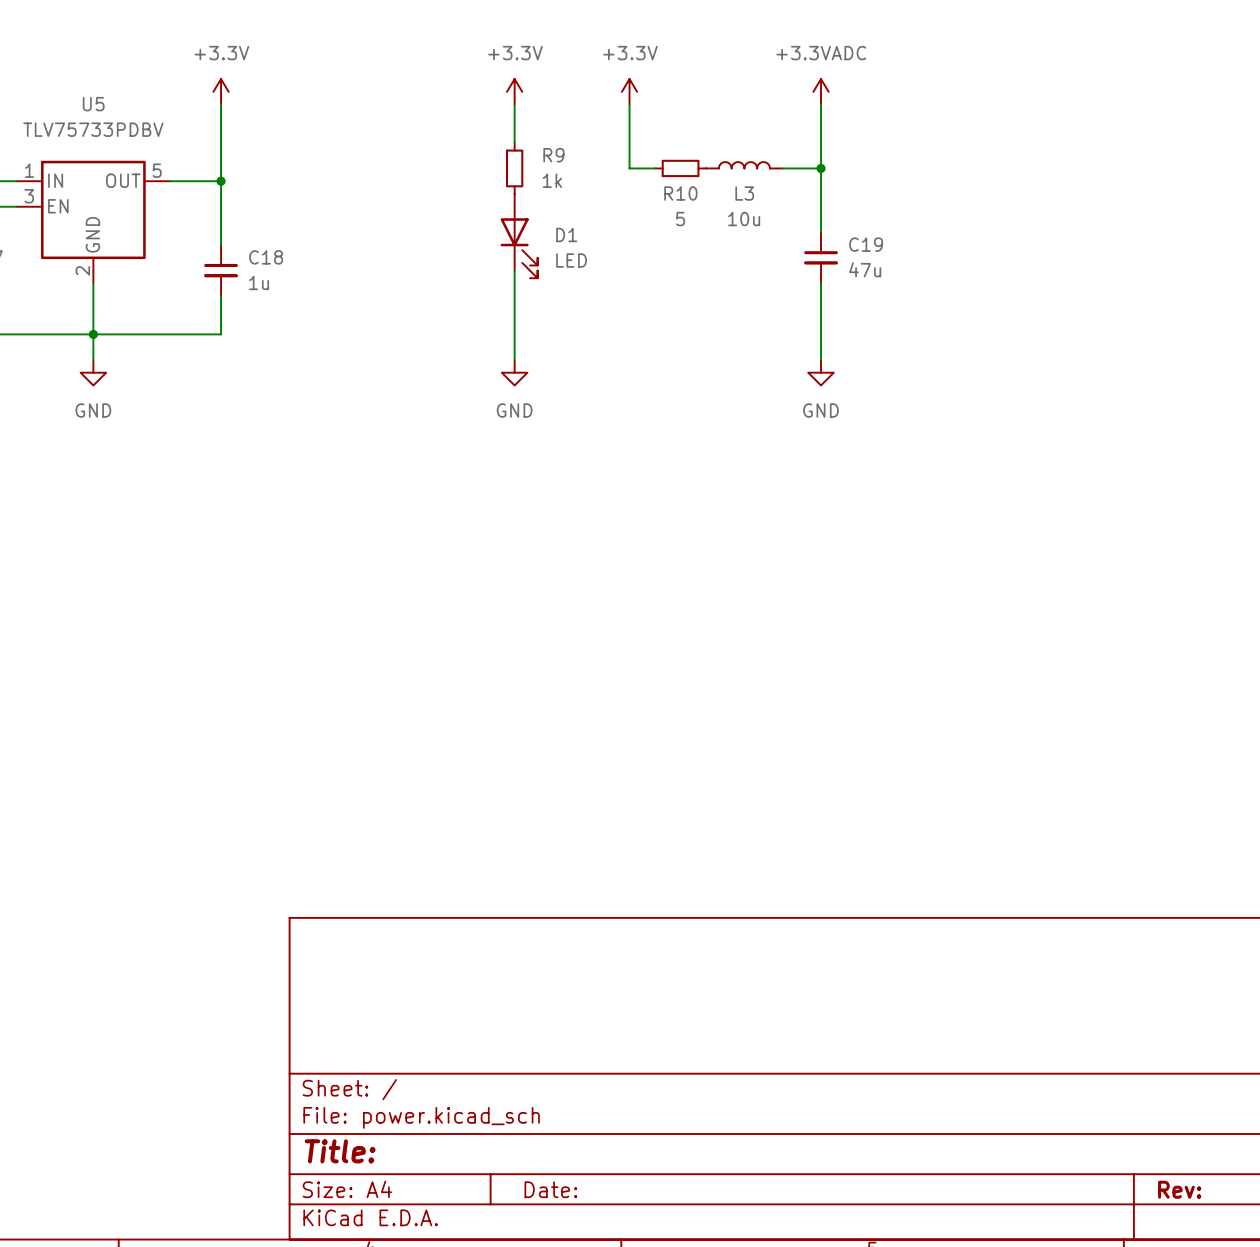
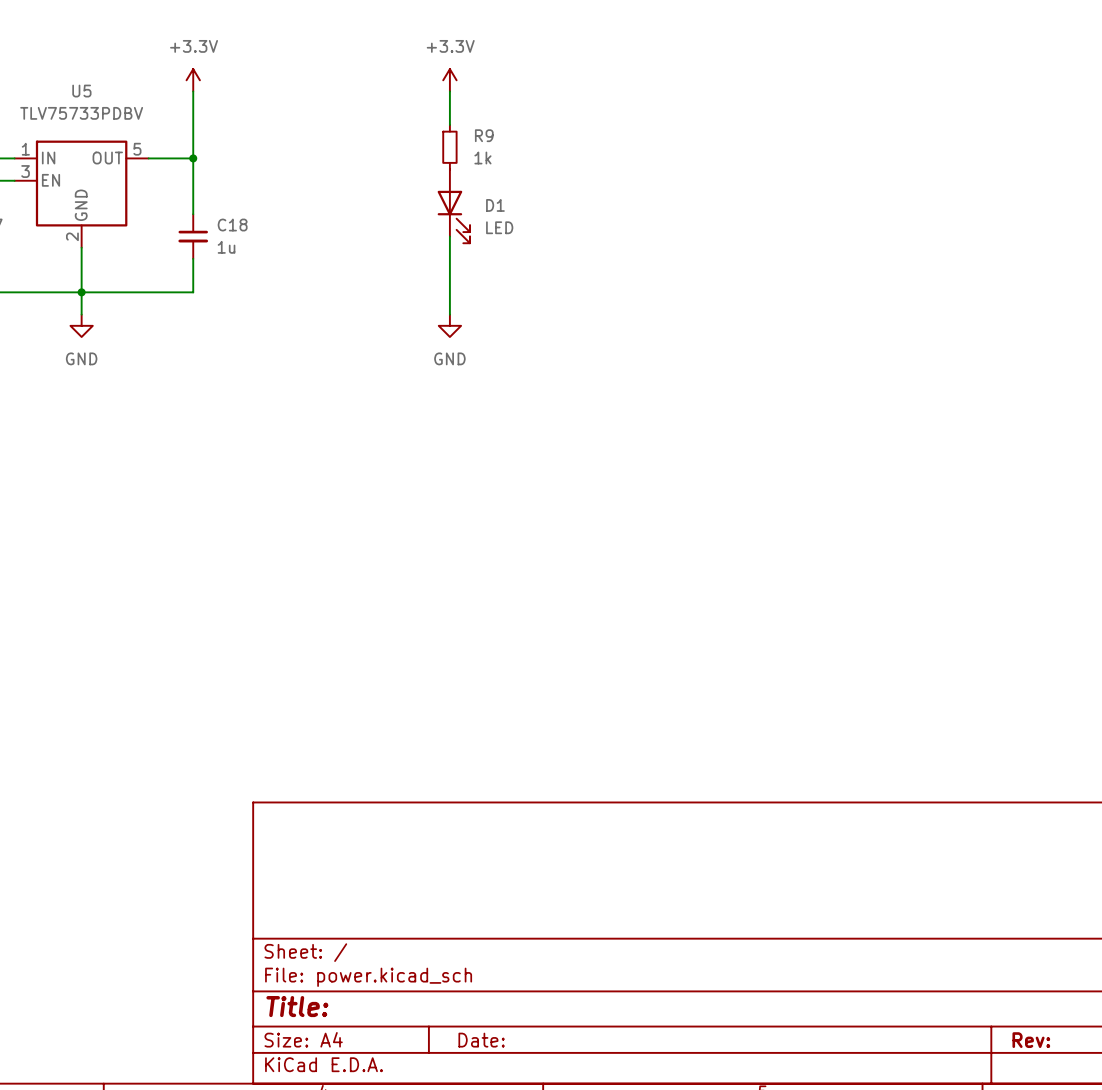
power symbol: +3.3V (629, 91) -> none
power symbol: +3.3VADC (821, 91) -> none
wire: (629, 104) (629, 168) (655, 168) -> none
wire: (821, 104) (821, 232) -> none
L3: 10u (744, 165) -> none
R10: 5 (680, 168) -> none
wire: (782, 168) (821, 168) -> none
junction: (821, 168) -> none
C19: 47u (821, 257) -> none
wire: (821, 283) (821, 359) -> none
power symbol: GND (821, 372) -> none

